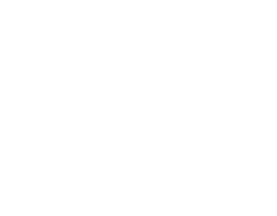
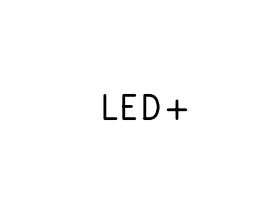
label: none -> LED+ (145, 106)

